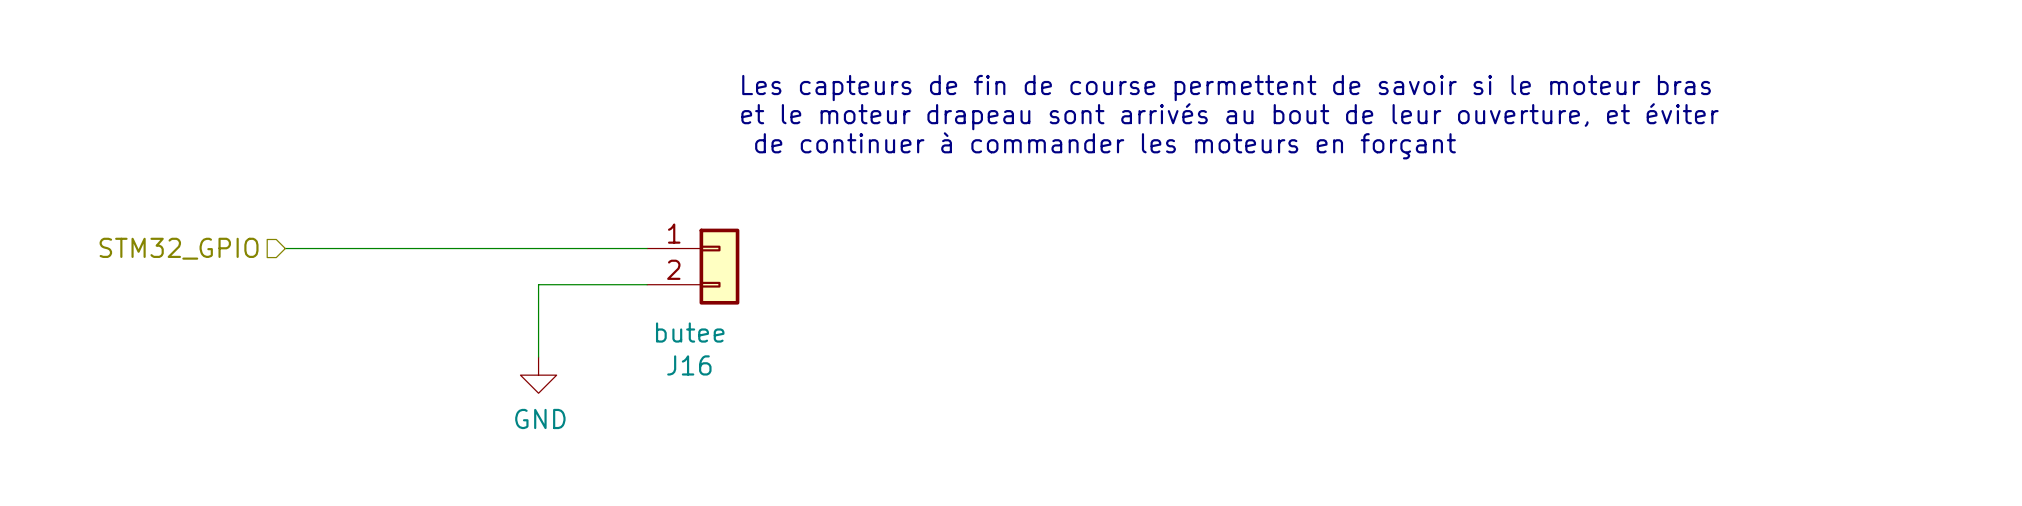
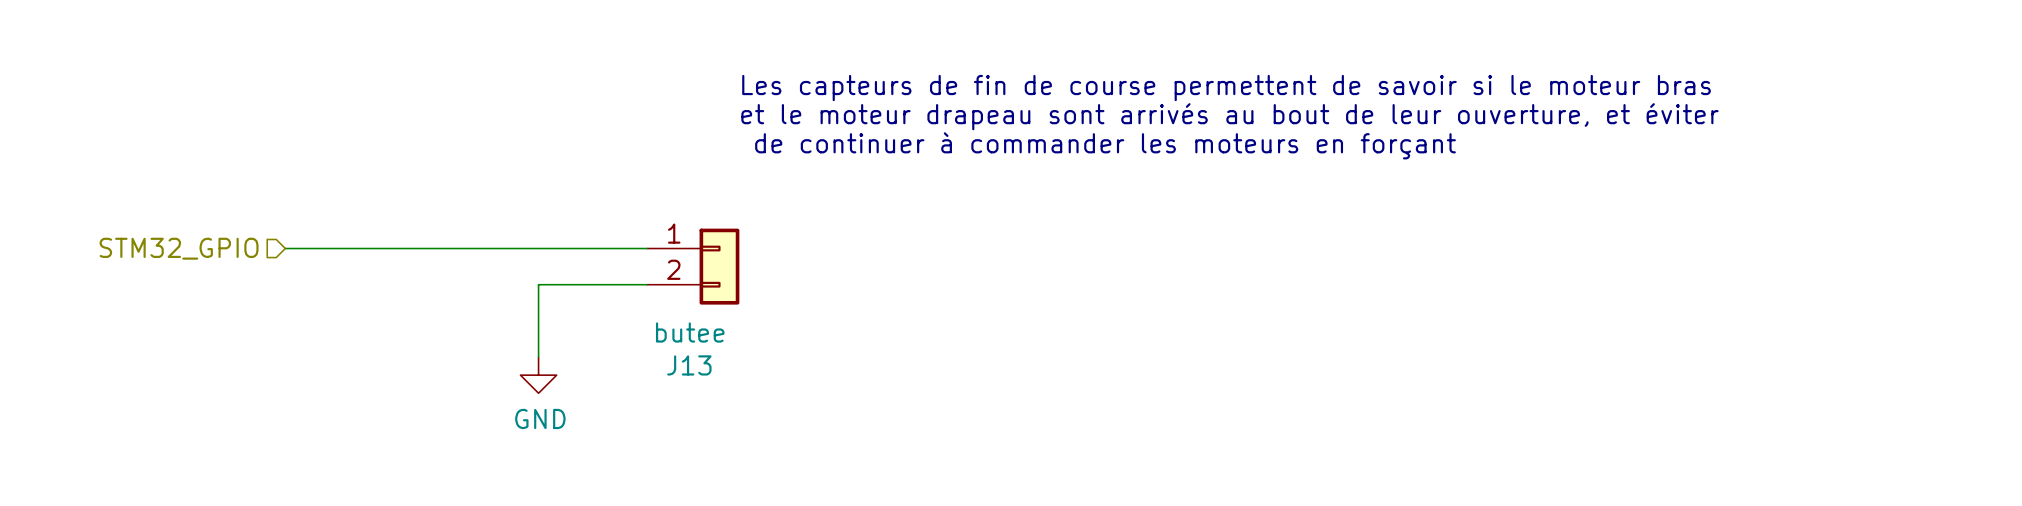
J16 name: J16 (689, 365) -> J13 (689, 365)

